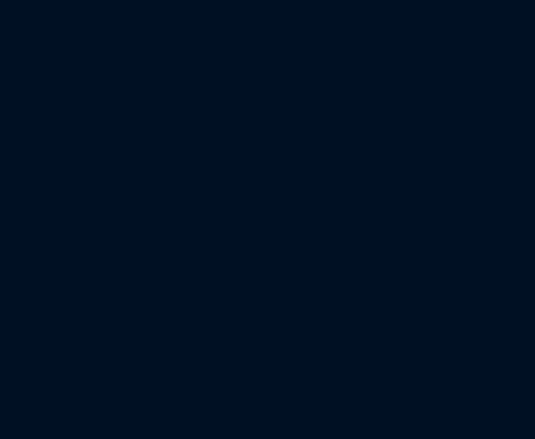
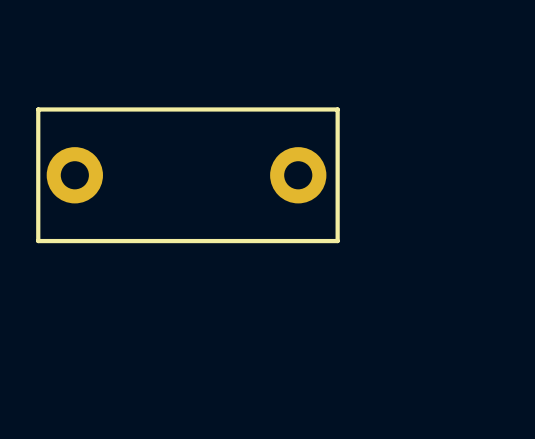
part: none -> (187, 175)

